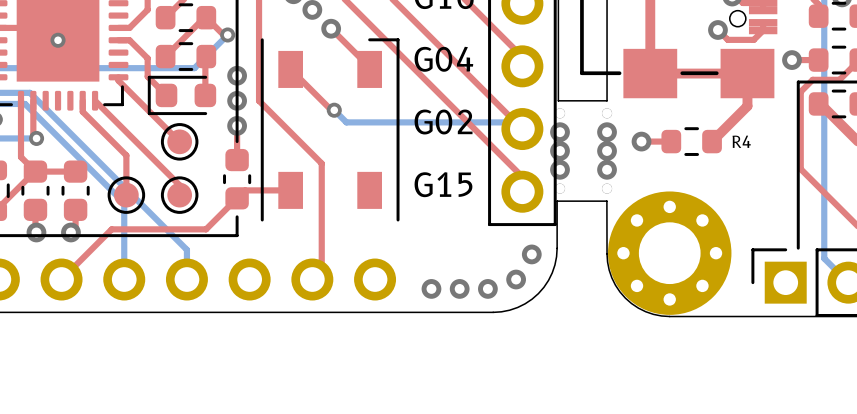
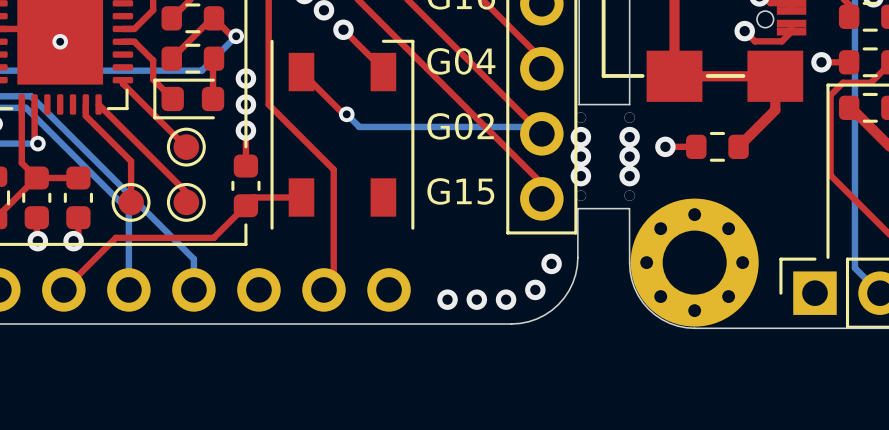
R4 name: R4 (741, 141) -> none

